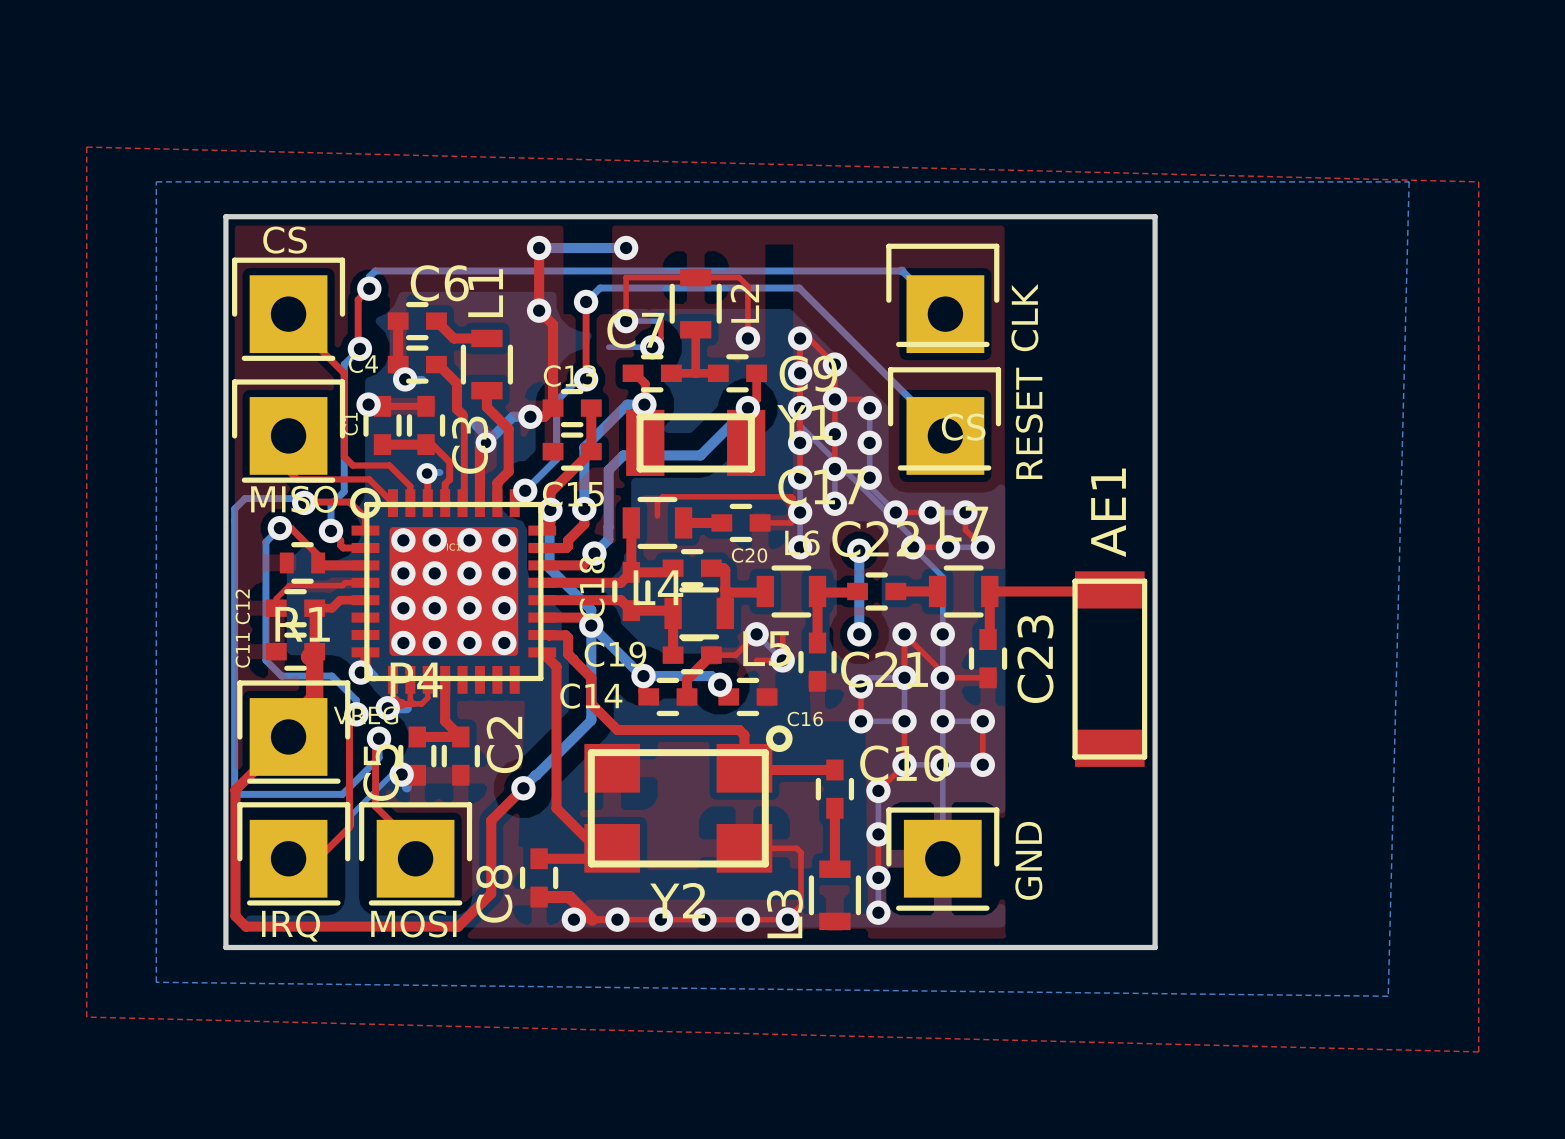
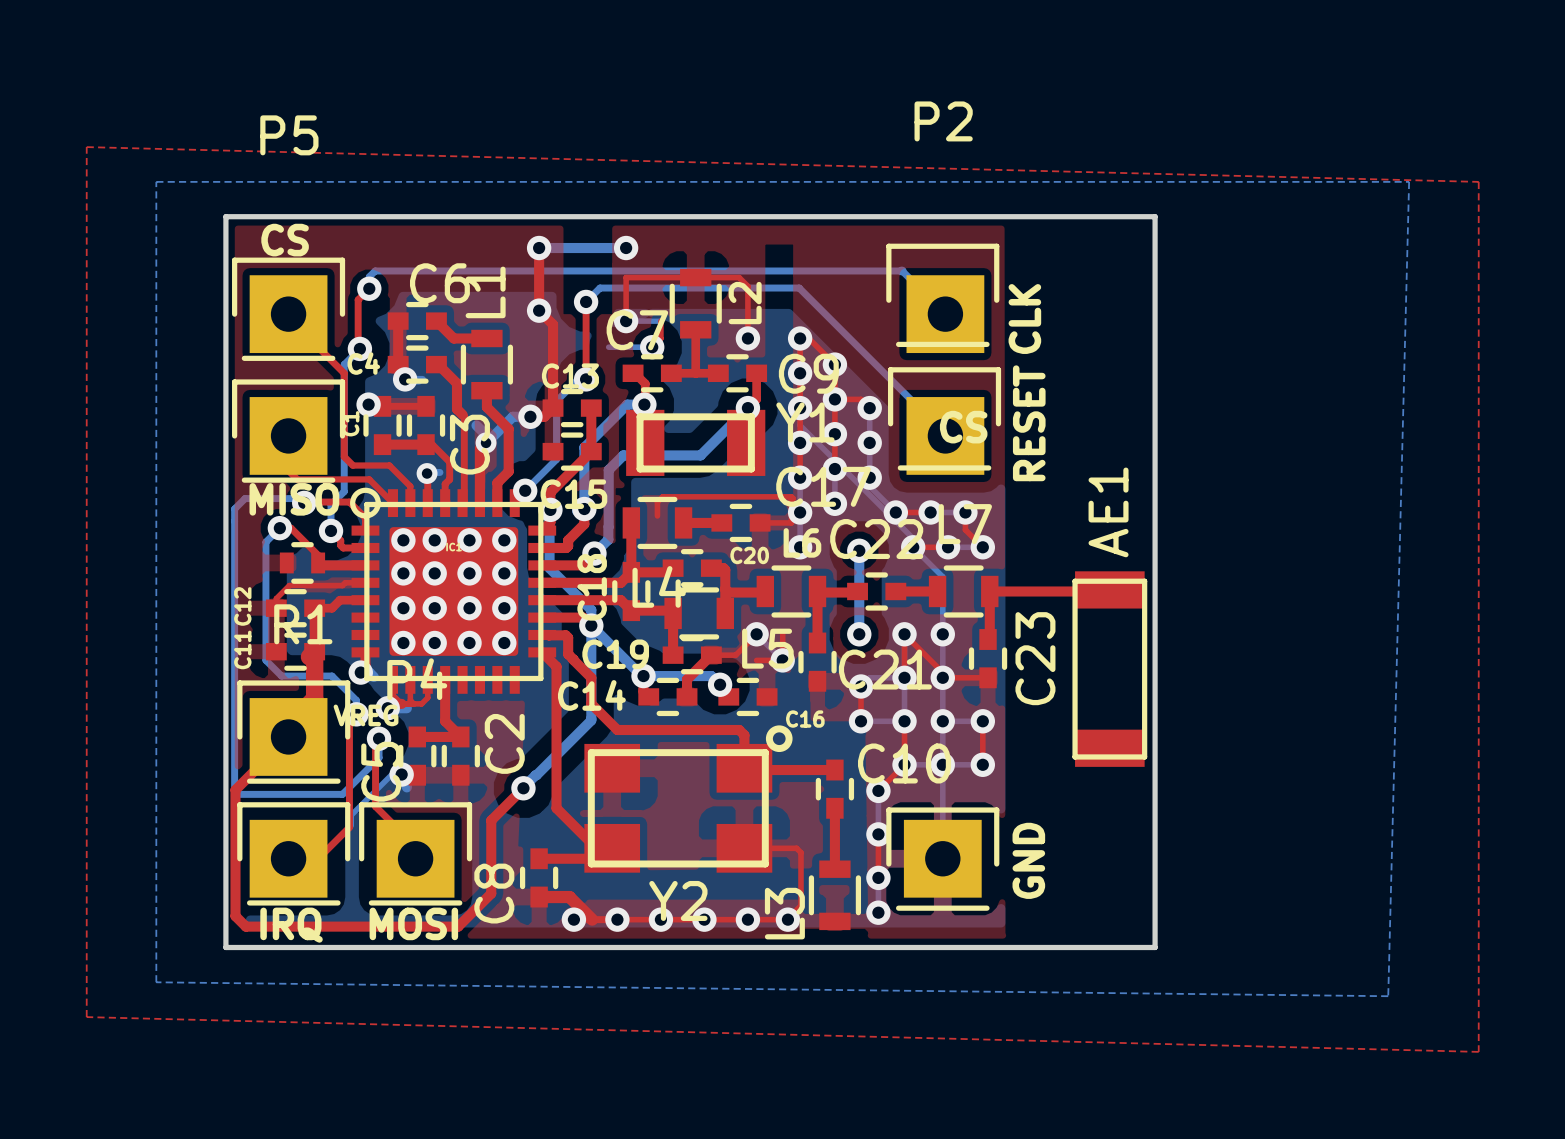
P2 name: none -> P2 (943, 121)
P5 name: none -> P5 (289, 135)

